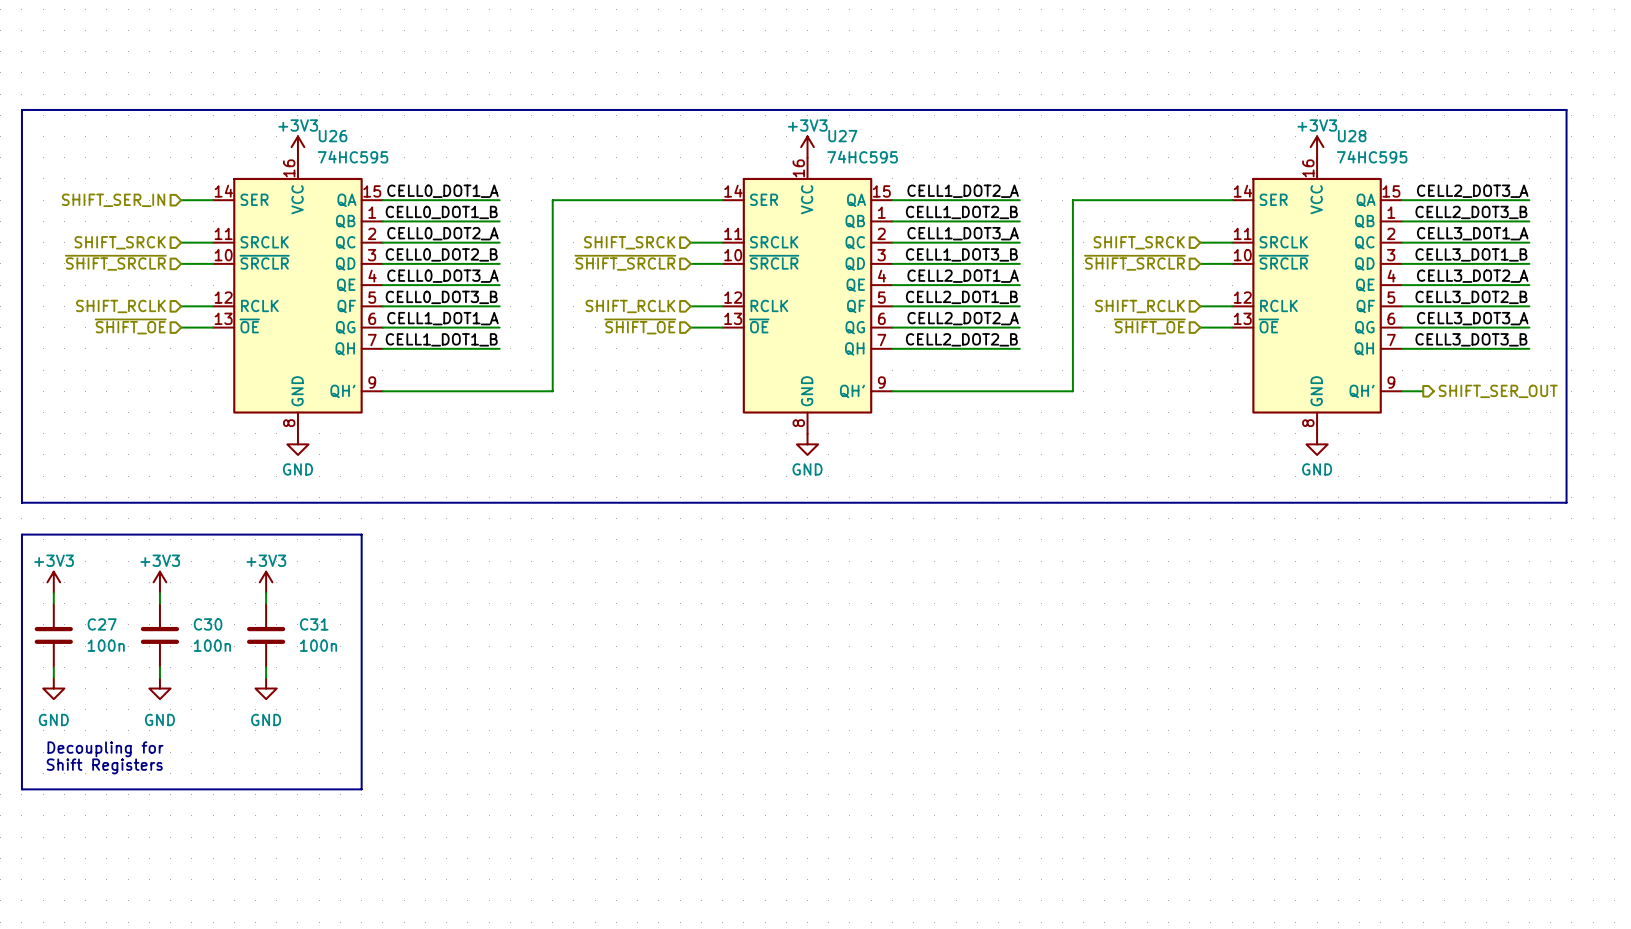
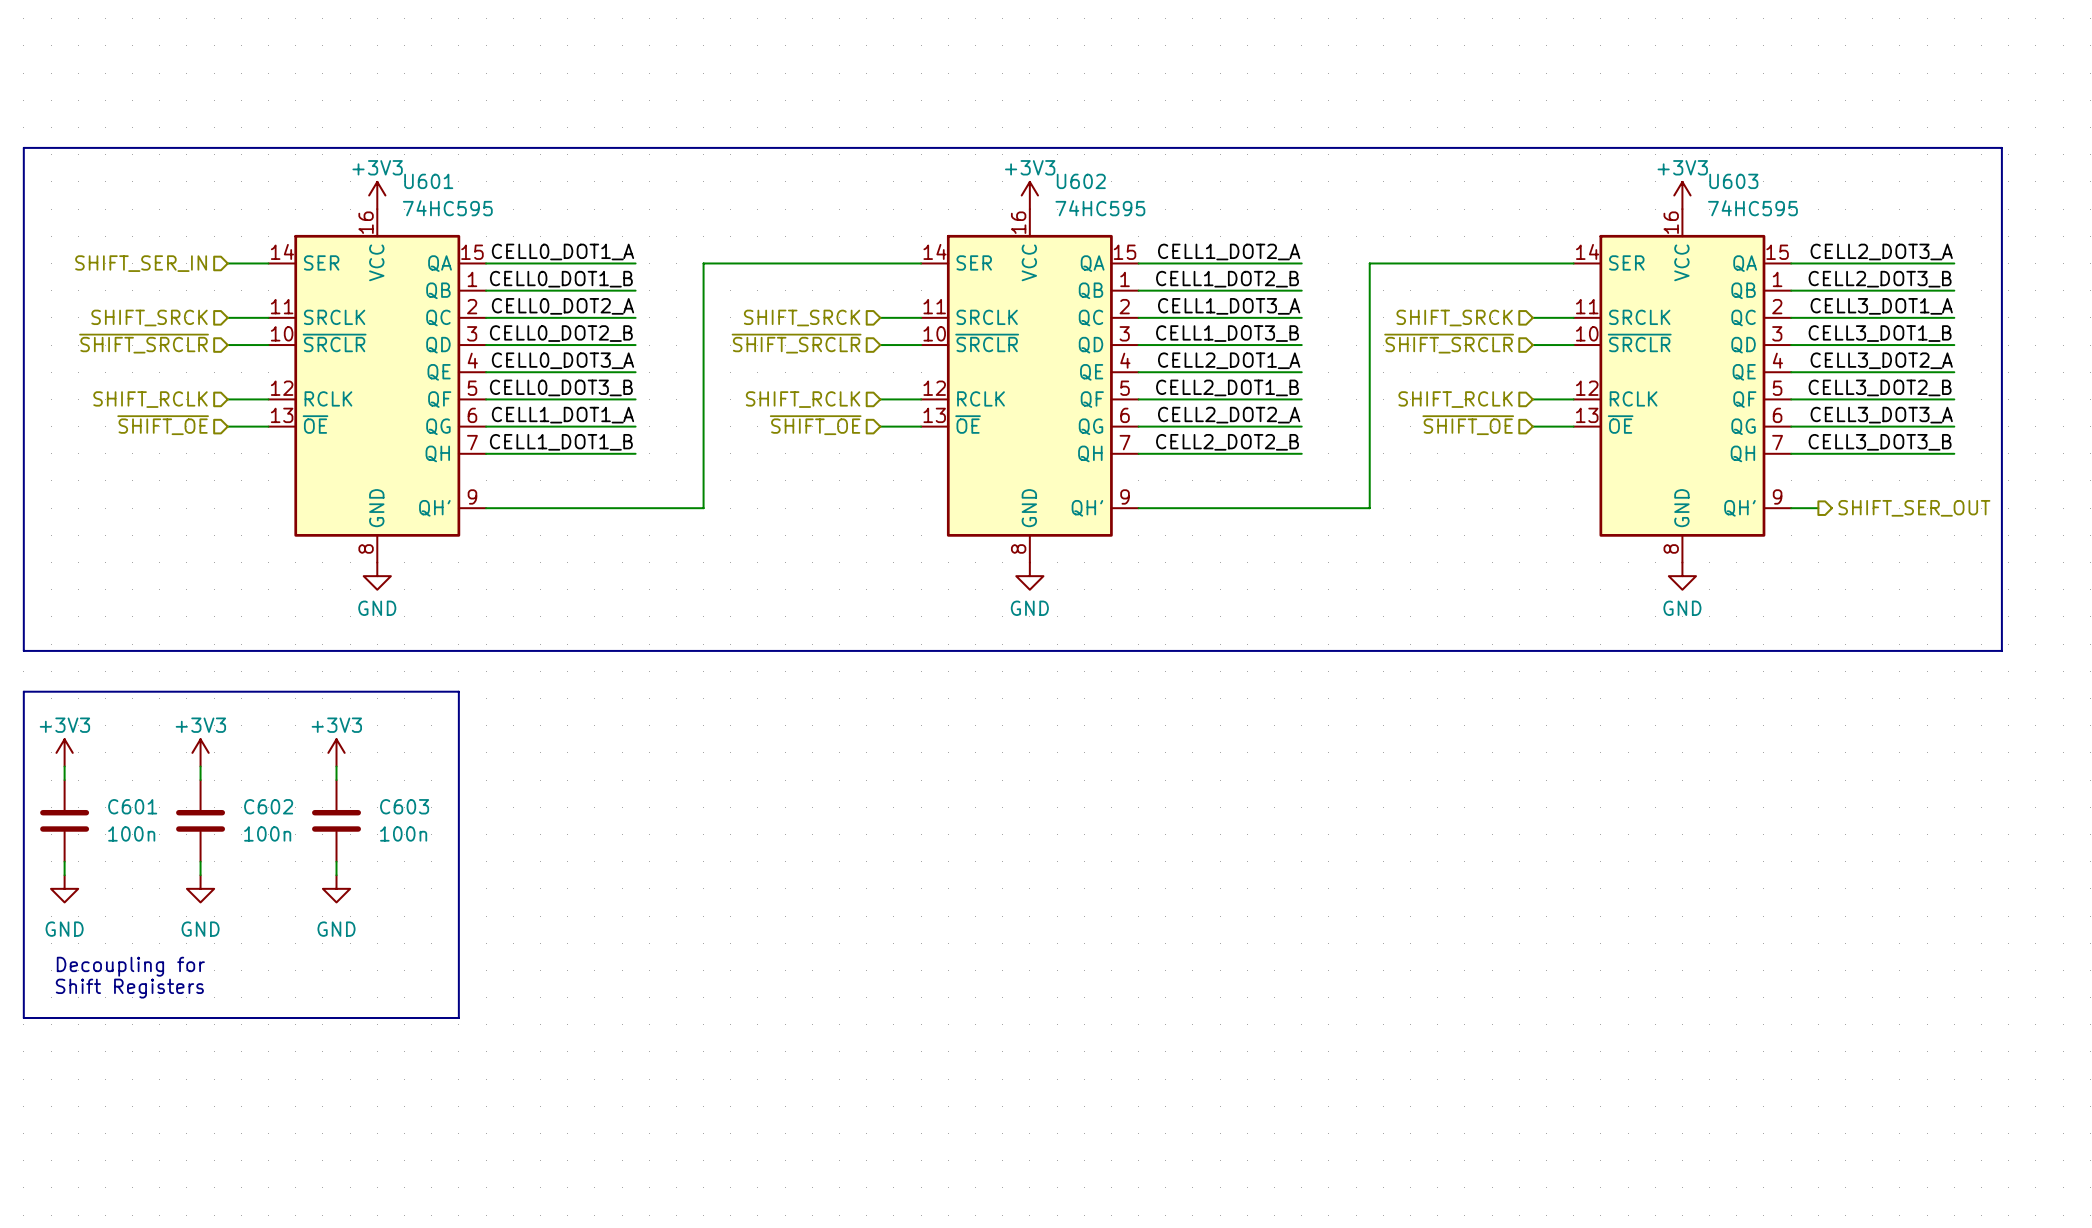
U26 name: U26 (333, 136) -> U601 (428, 181)
U27 name: U27 (842, 136) -> U602 (1081, 181)
U28 name: U28 (1352, 136) -> U603 (1733, 181)
C27 name: C27 (102, 624) -> C601 (132, 806)
C30 name: C30 (208, 624) -> C602 (268, 806)
C31 name: C31 (314, 624) -> C603 (404, 806)

